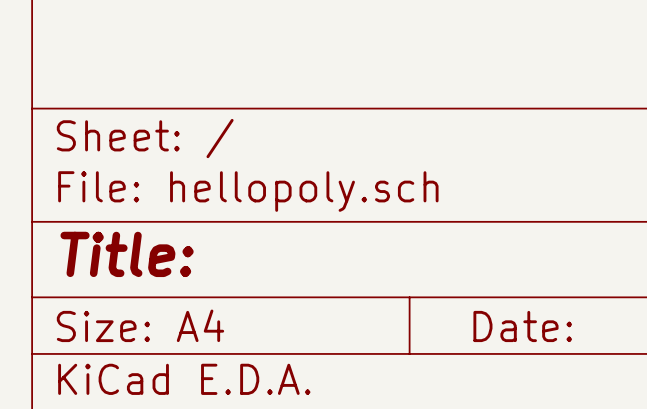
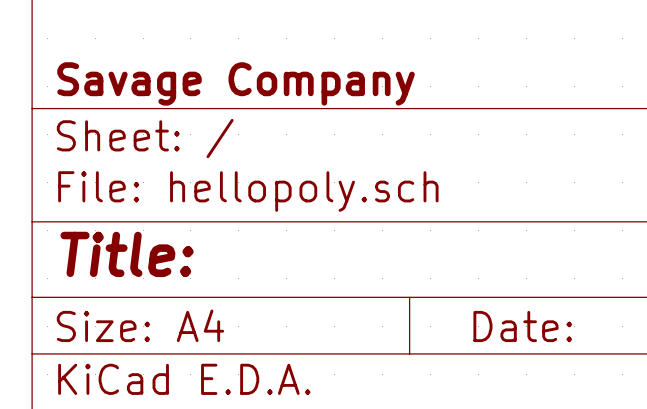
title block: none -> Savage Company (236, 83)

